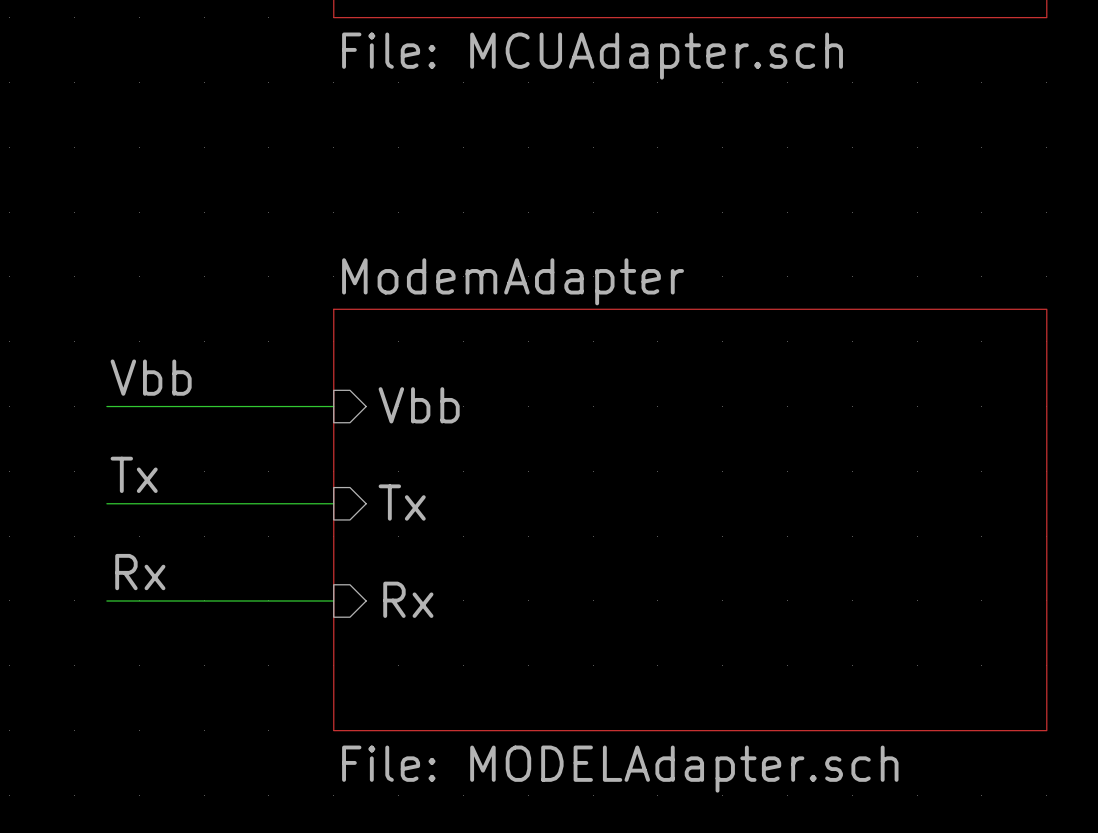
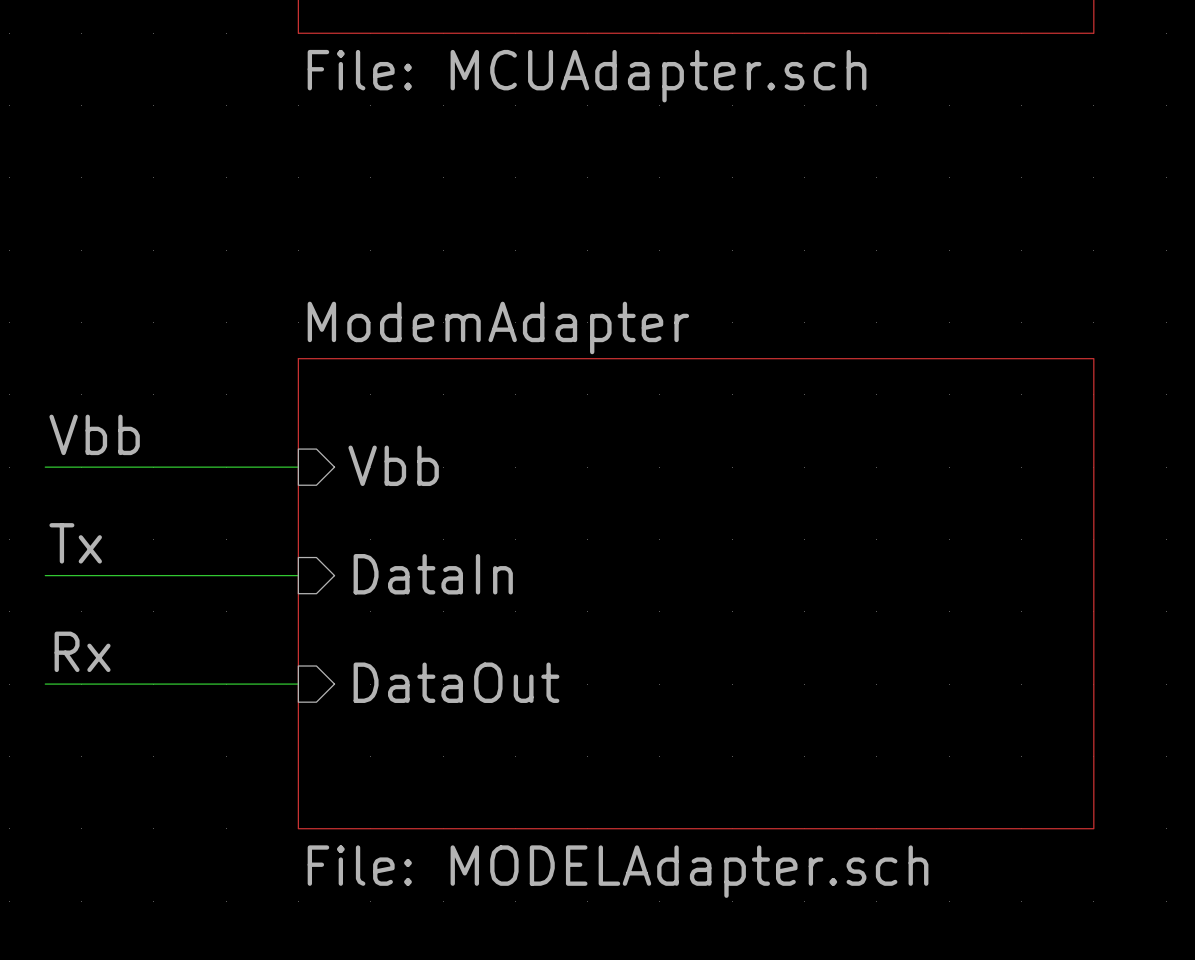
sheet pin: Tx (402, 502) -> DataIn (433, 574)
sheet pin: Rx (408, 599) -> DataOut (456, 682)

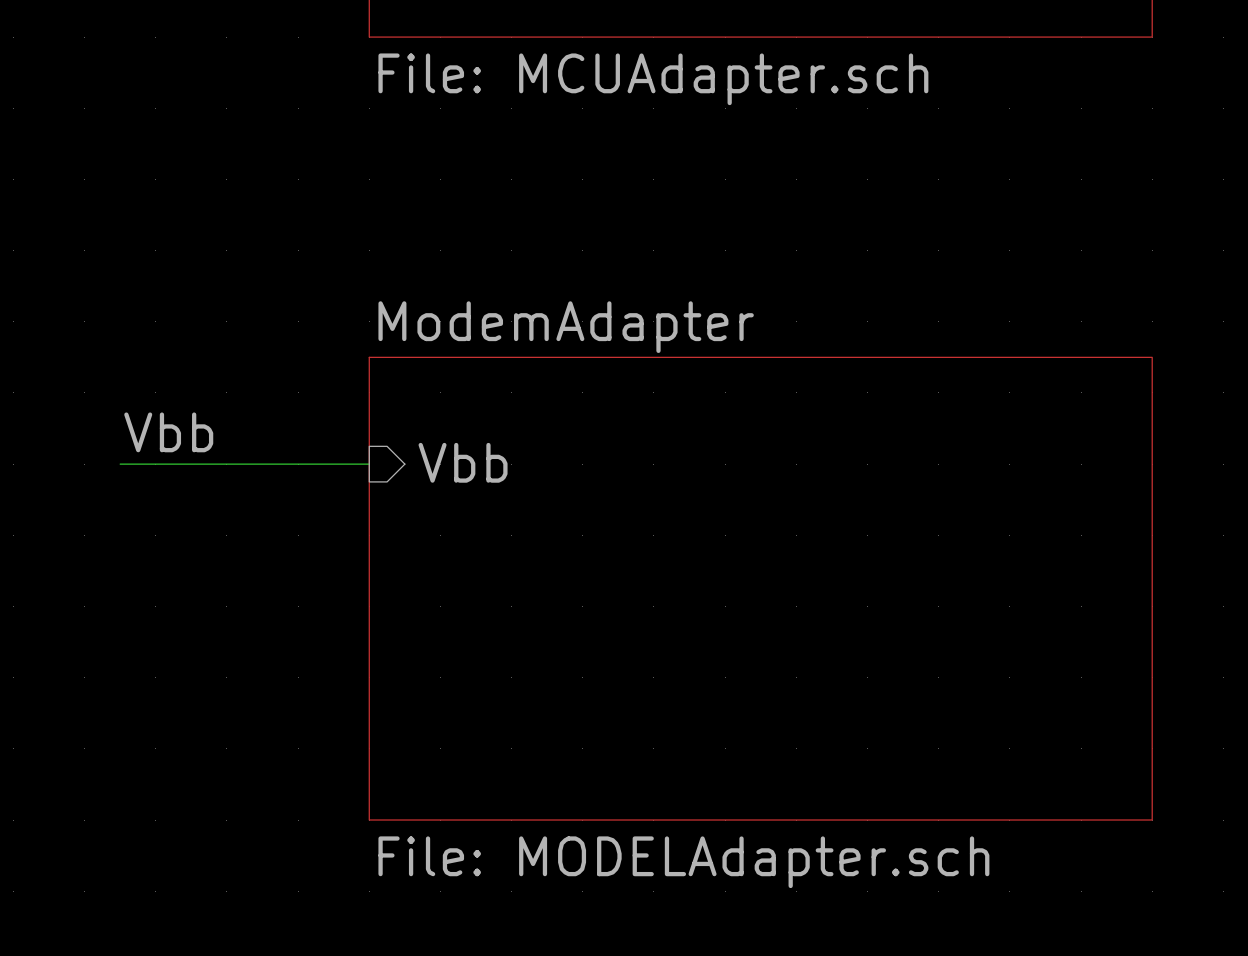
label: Tx (75, 543) -> none
sheet pin: DataIn (433, 574) -> none
wire: (45, 575) (298, 575) -> none
label: Rx (82, 651) -> none
sheet pin: DataOut (456, 682) -> none
wire: (45, 684) (298, 684) -> none

